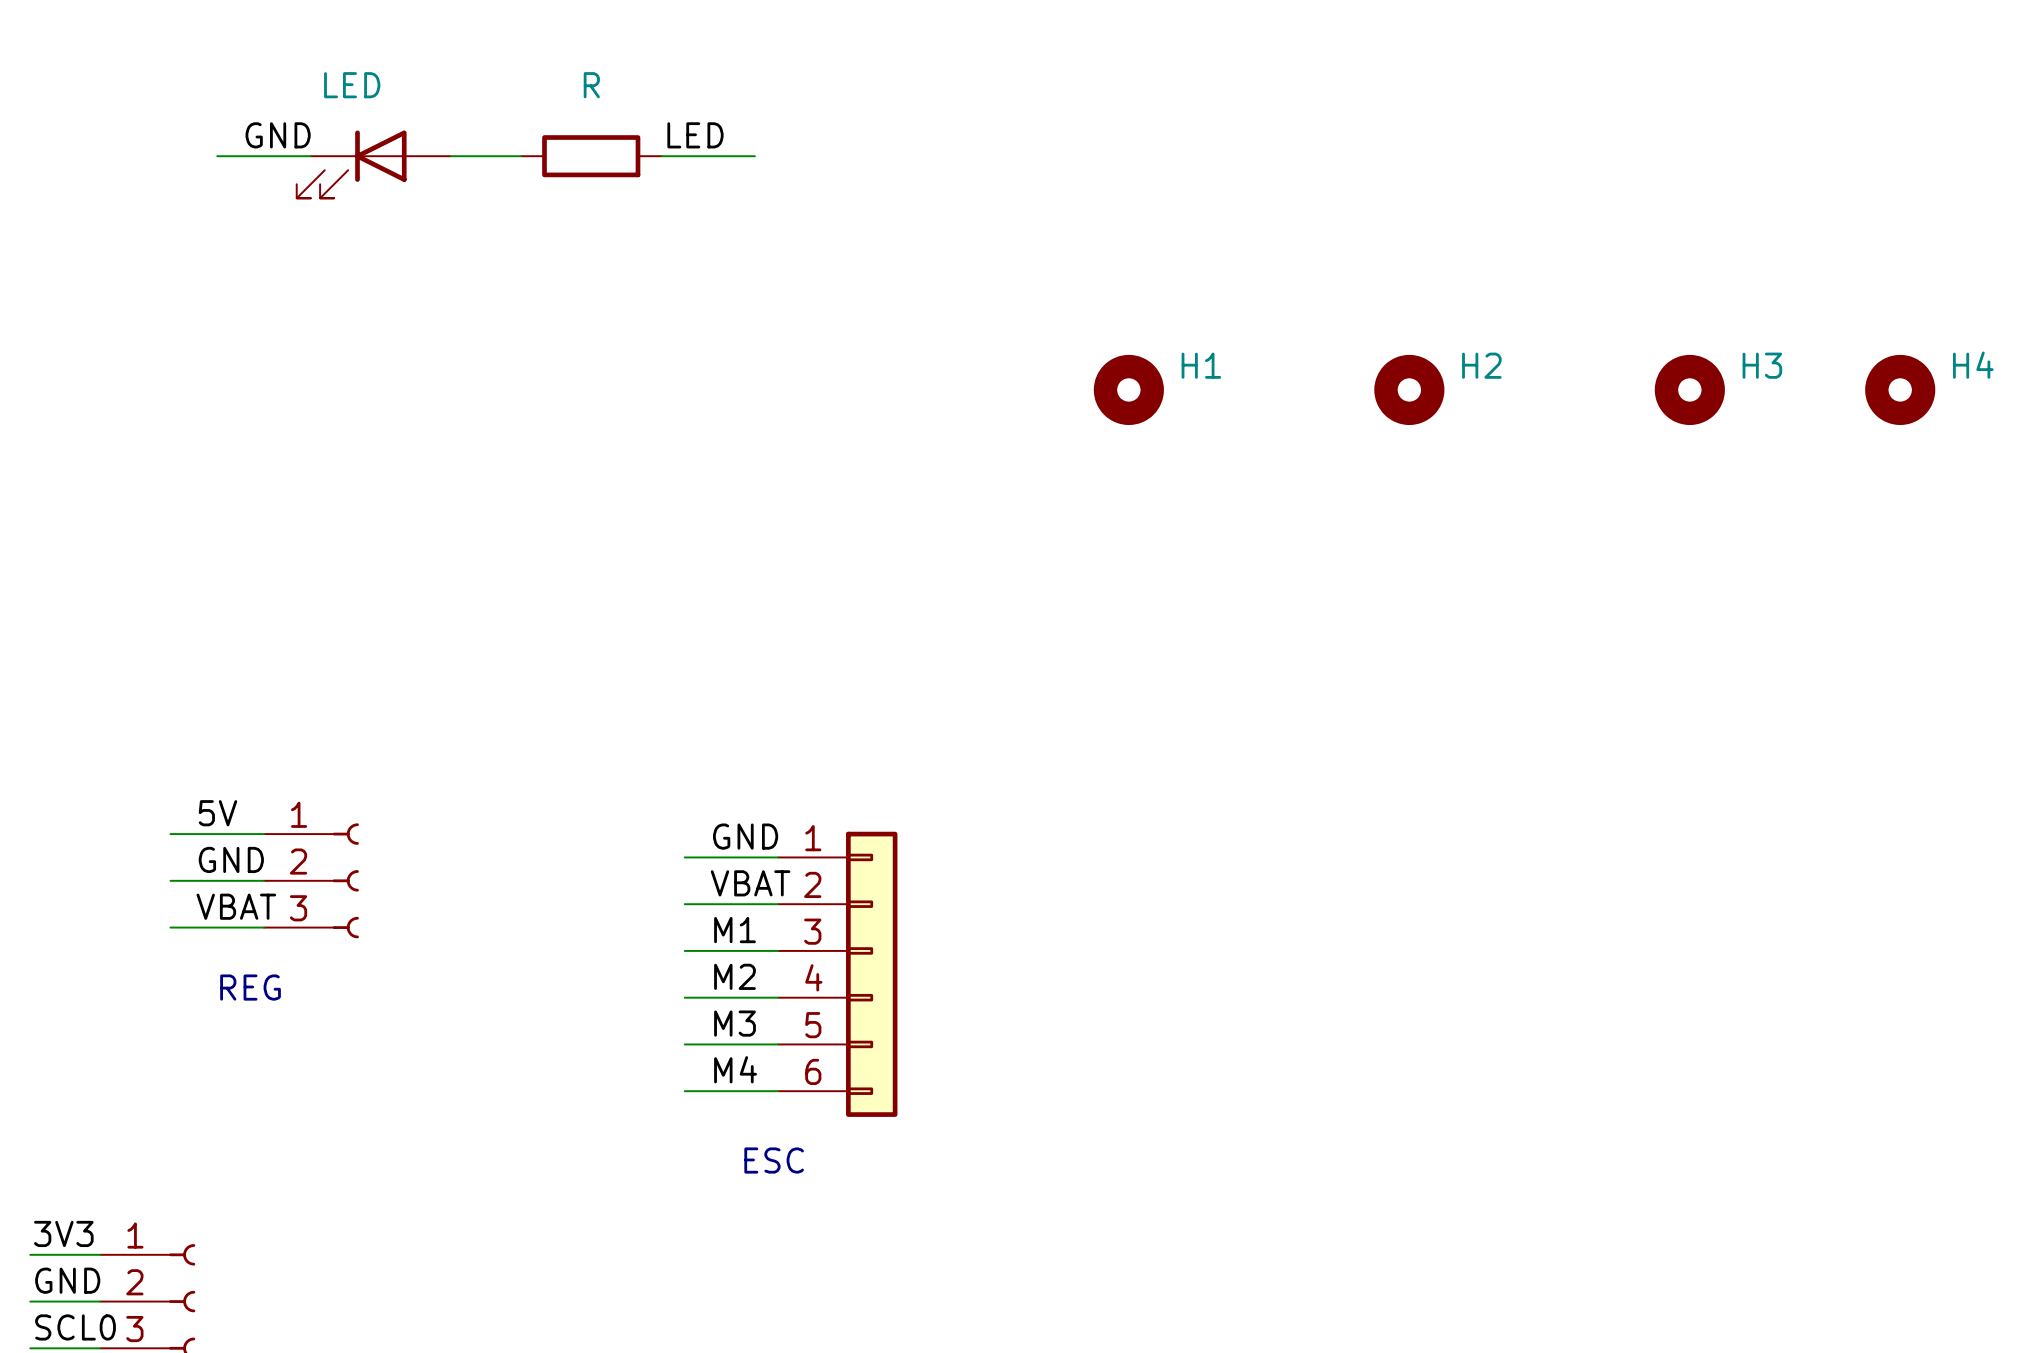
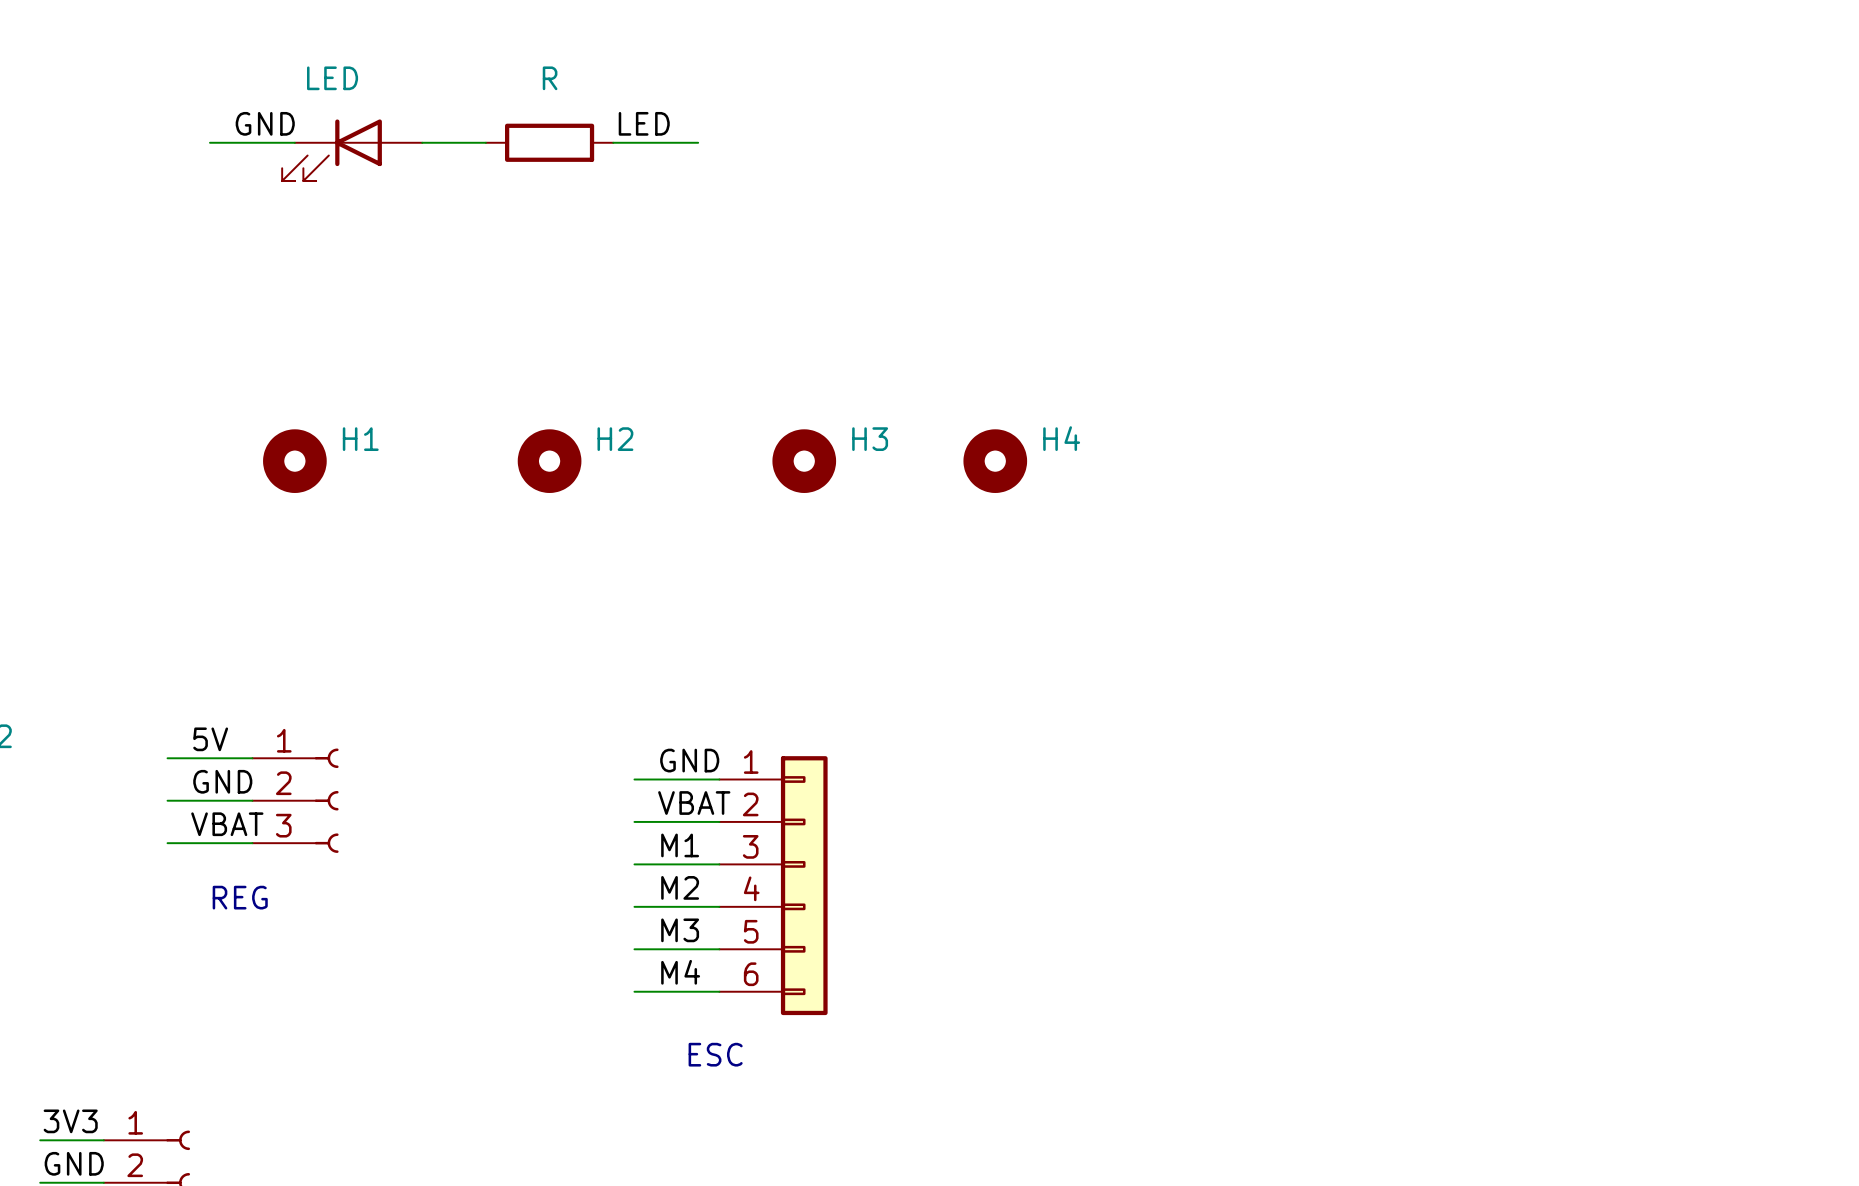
H1 position: (1128, 389) -> (294, 461)
H2 position: (1409, 389) -> (549, 461)
H3 position: (1689, 389) -> (804, 461)
H4 position: (1900, 389) -> (995, 461)

